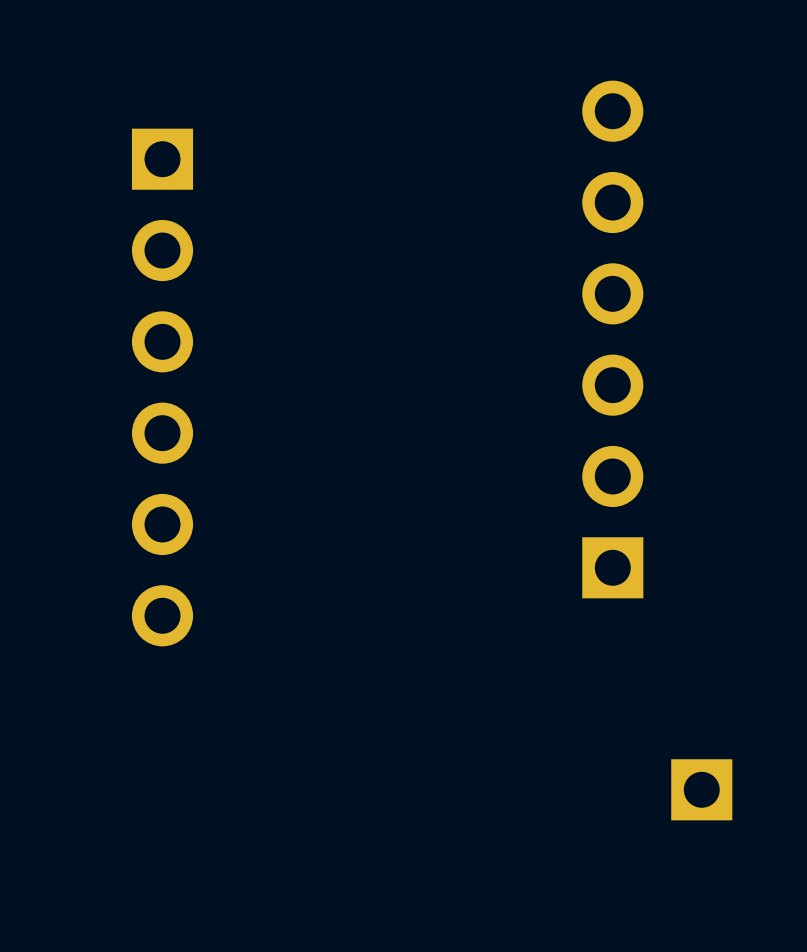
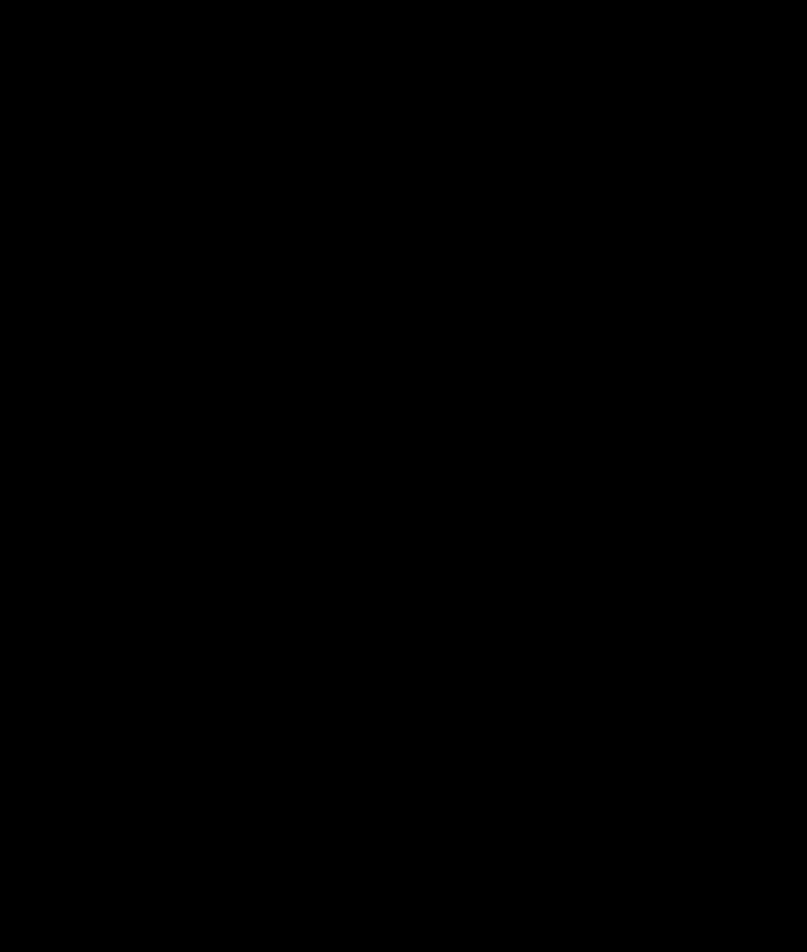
part: (612, 339) -> none
part: (162, 387) -> none
part: (701, 789) -> none

